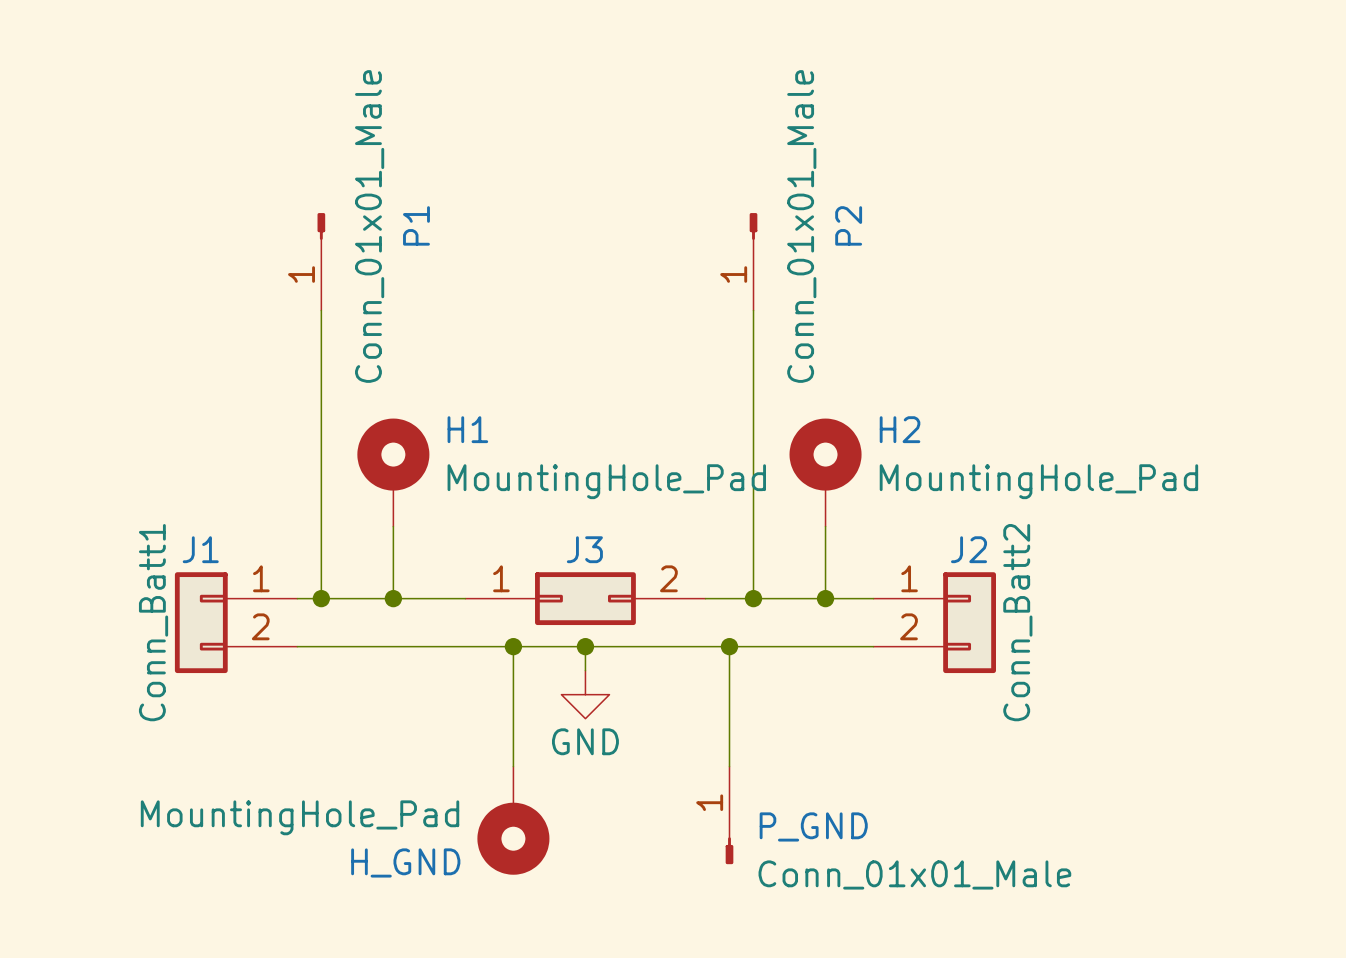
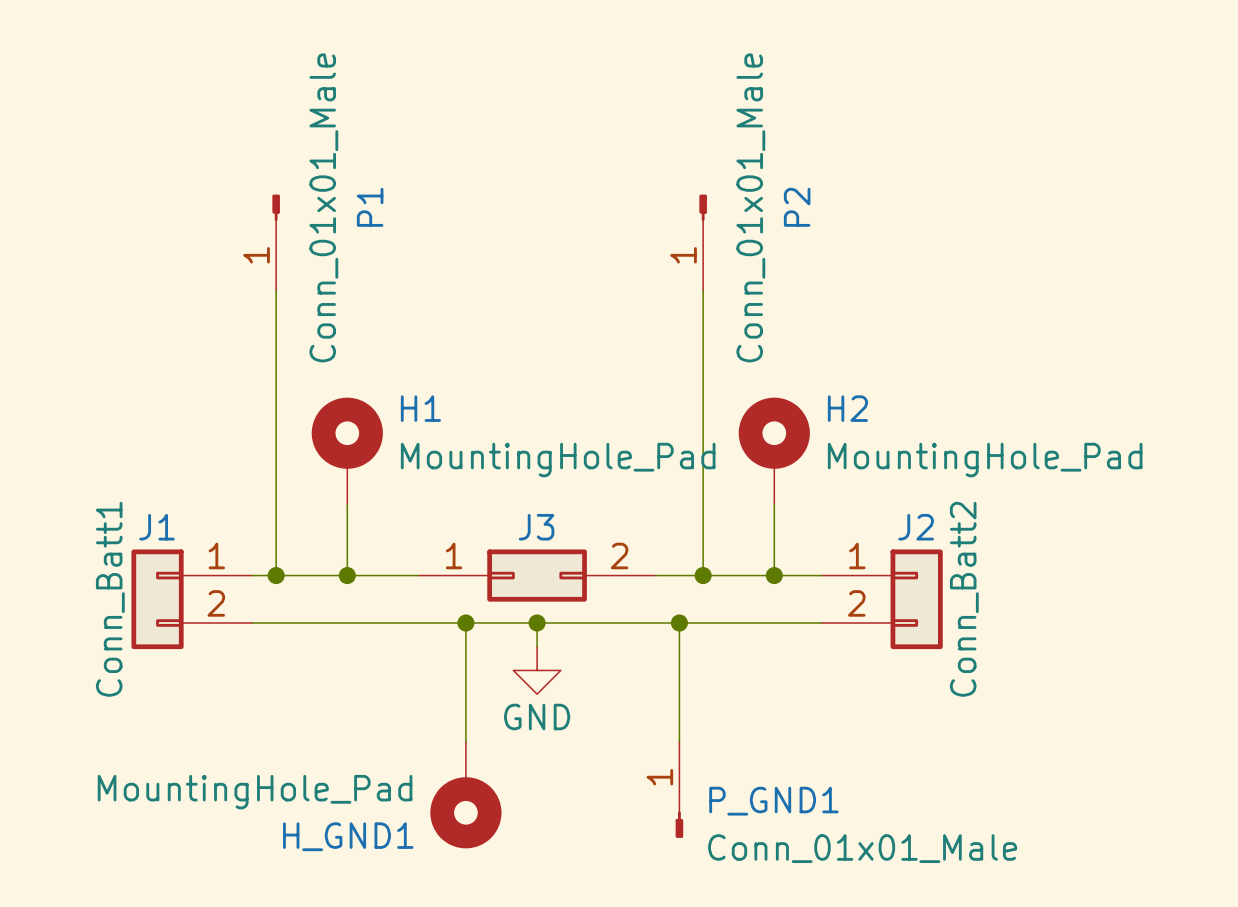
P_GND name: P_GND (813, 826) -> P_GND1 (773, 801)
H_GND name: H_GND (405, 862) -> H_GND1 (348, 836)

